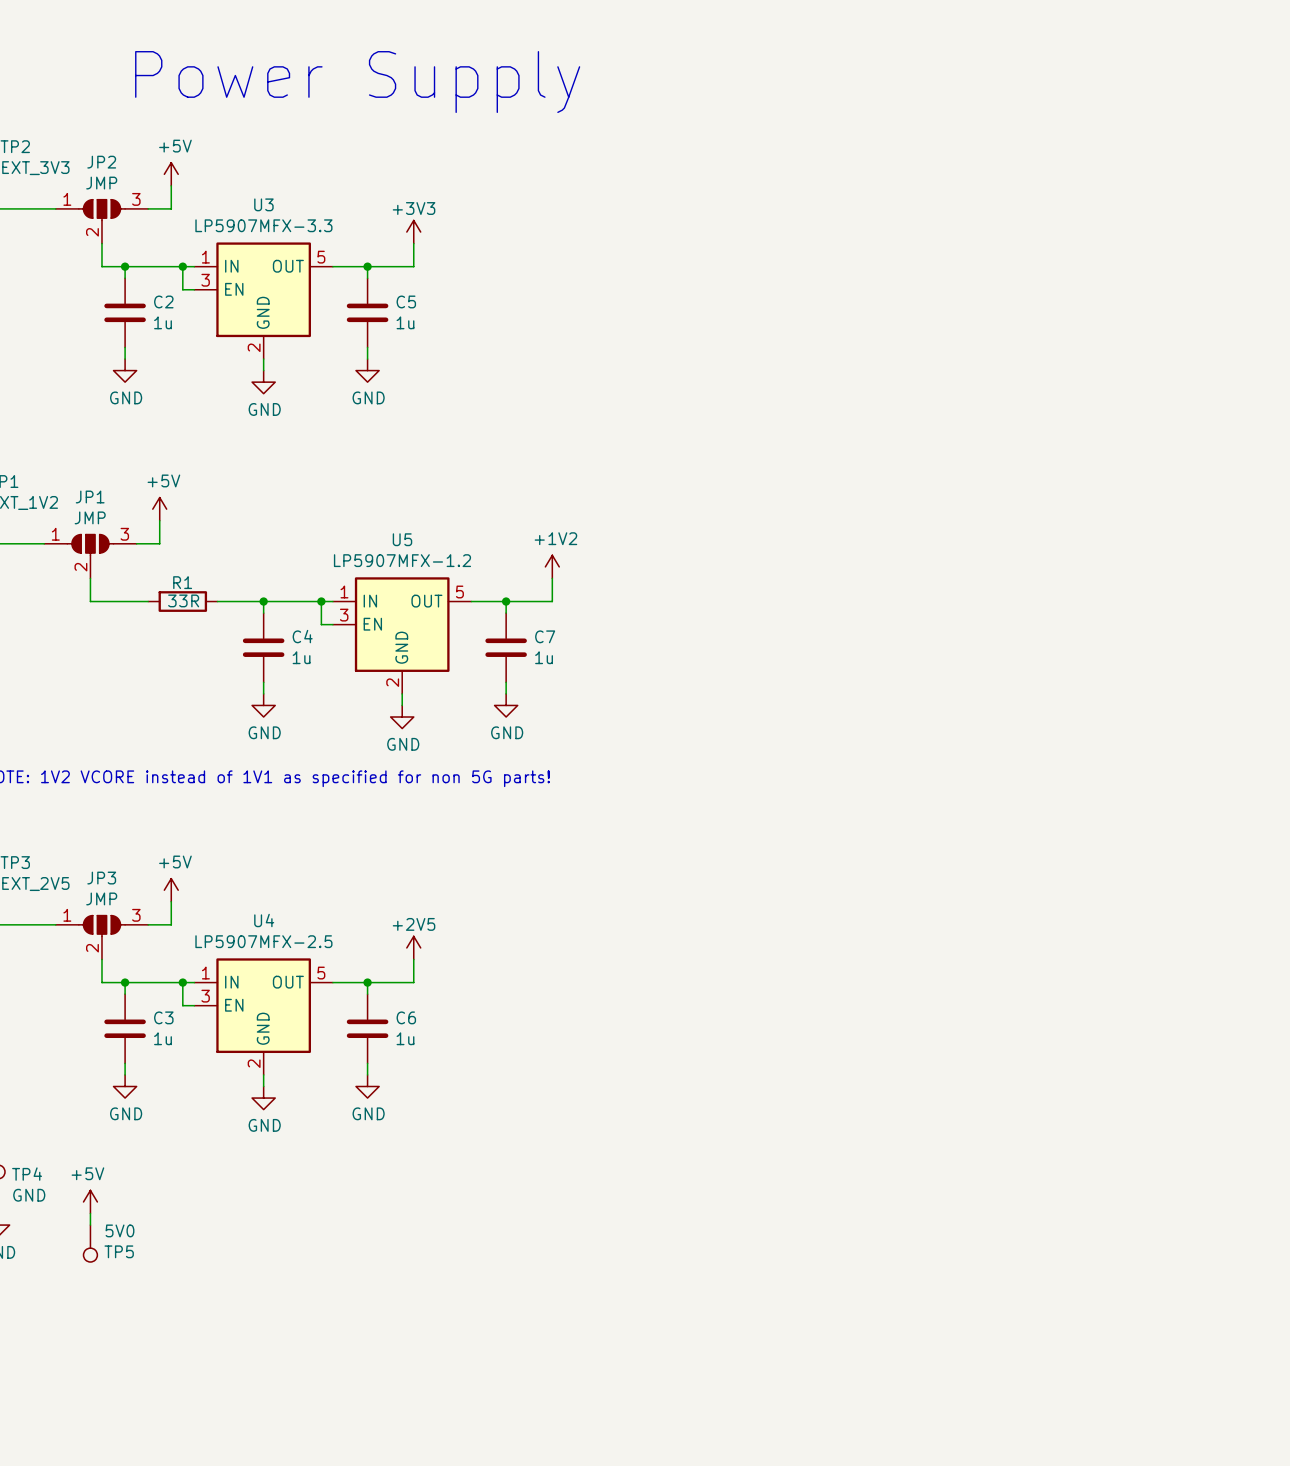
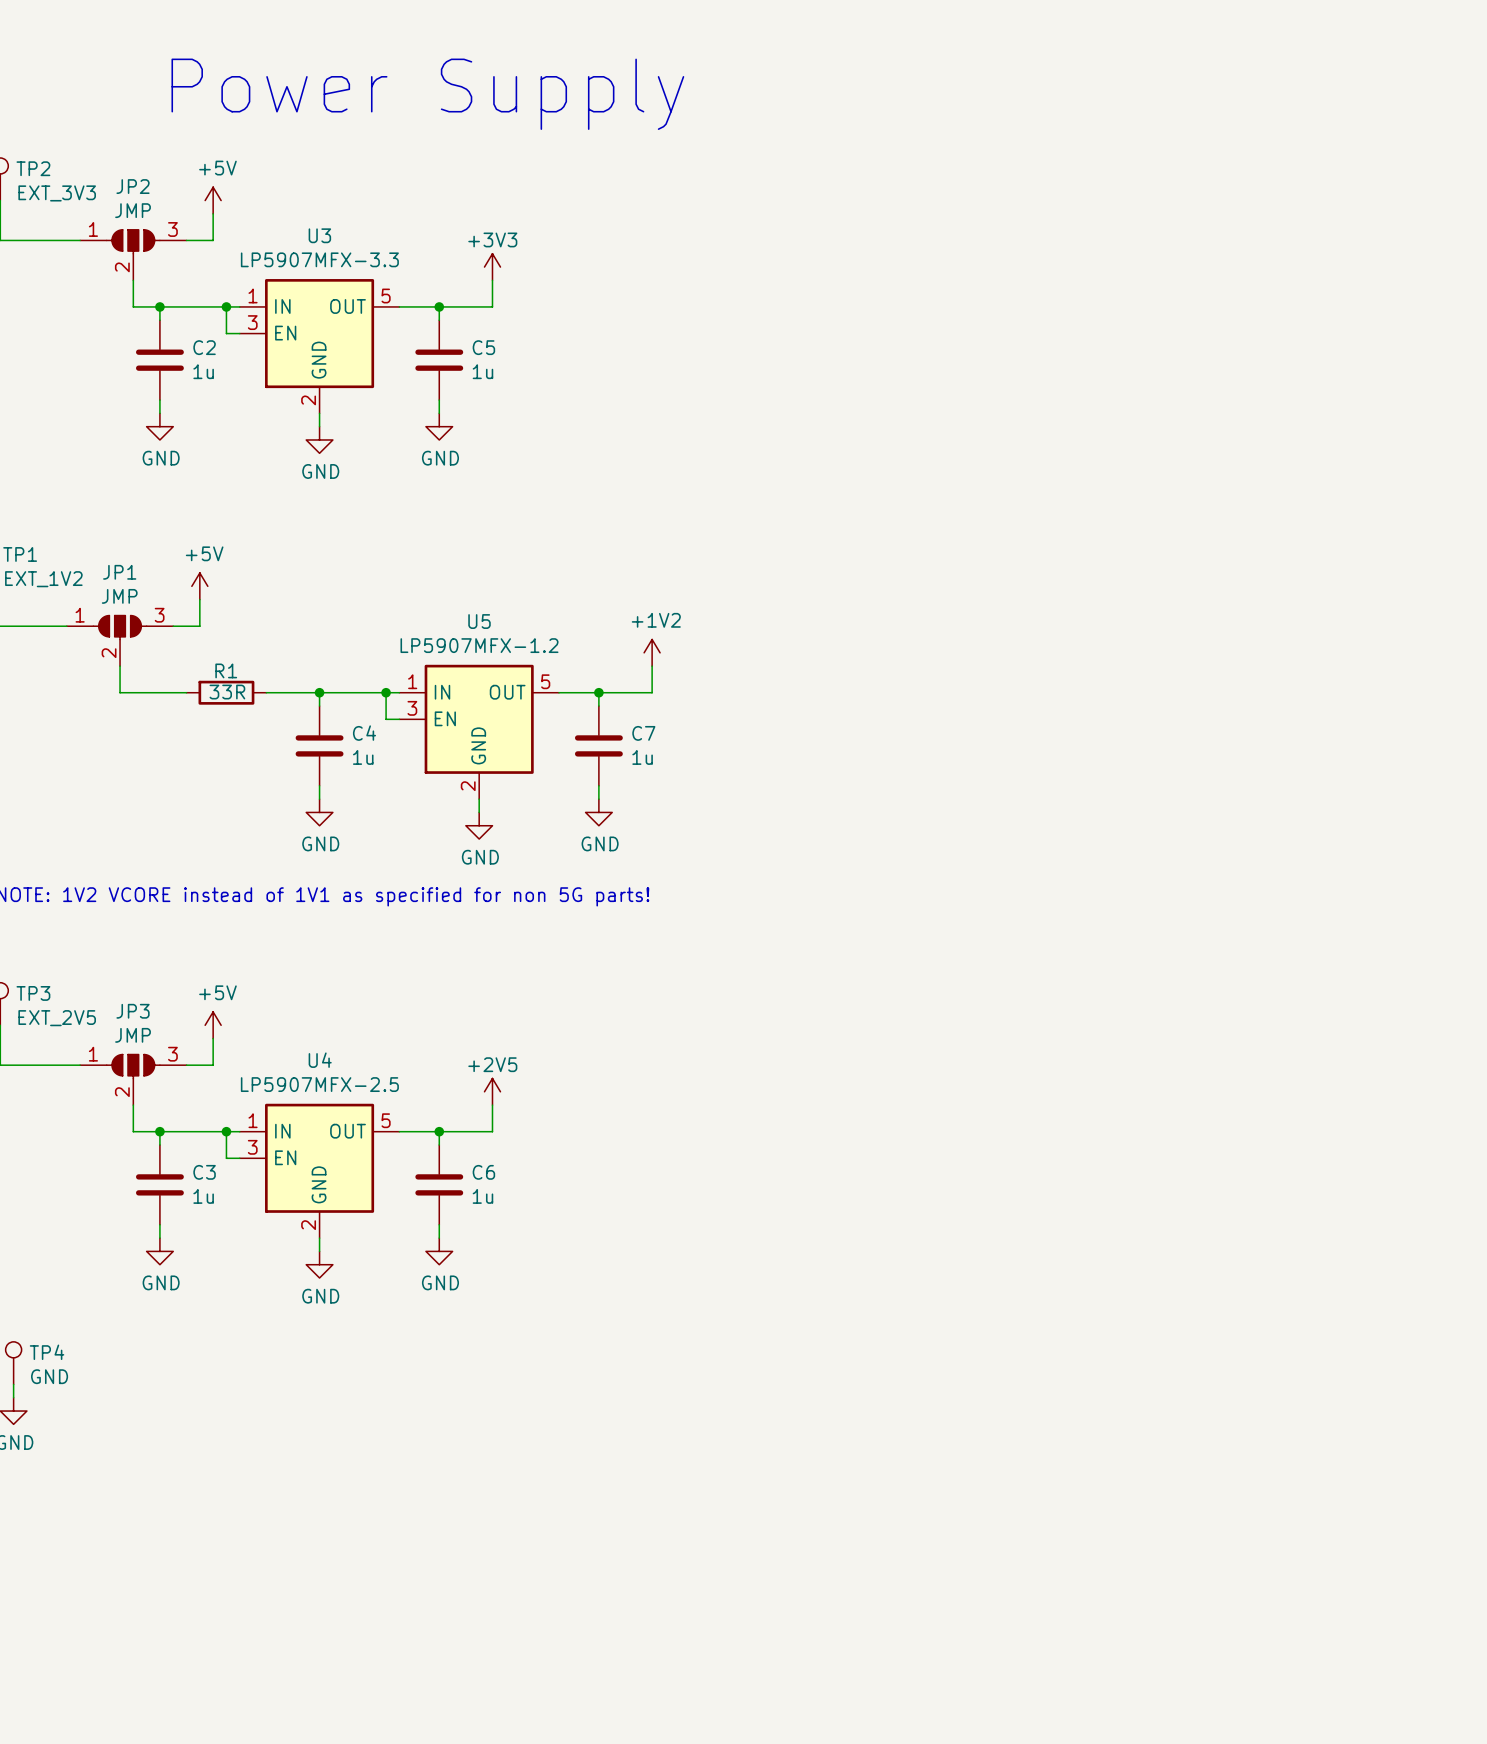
power symbol: +5V (90, 1201) -> none
wire: (90, 1213) (90, 1225) -> none
TP5: 5V0 (90, 1243) -> none

